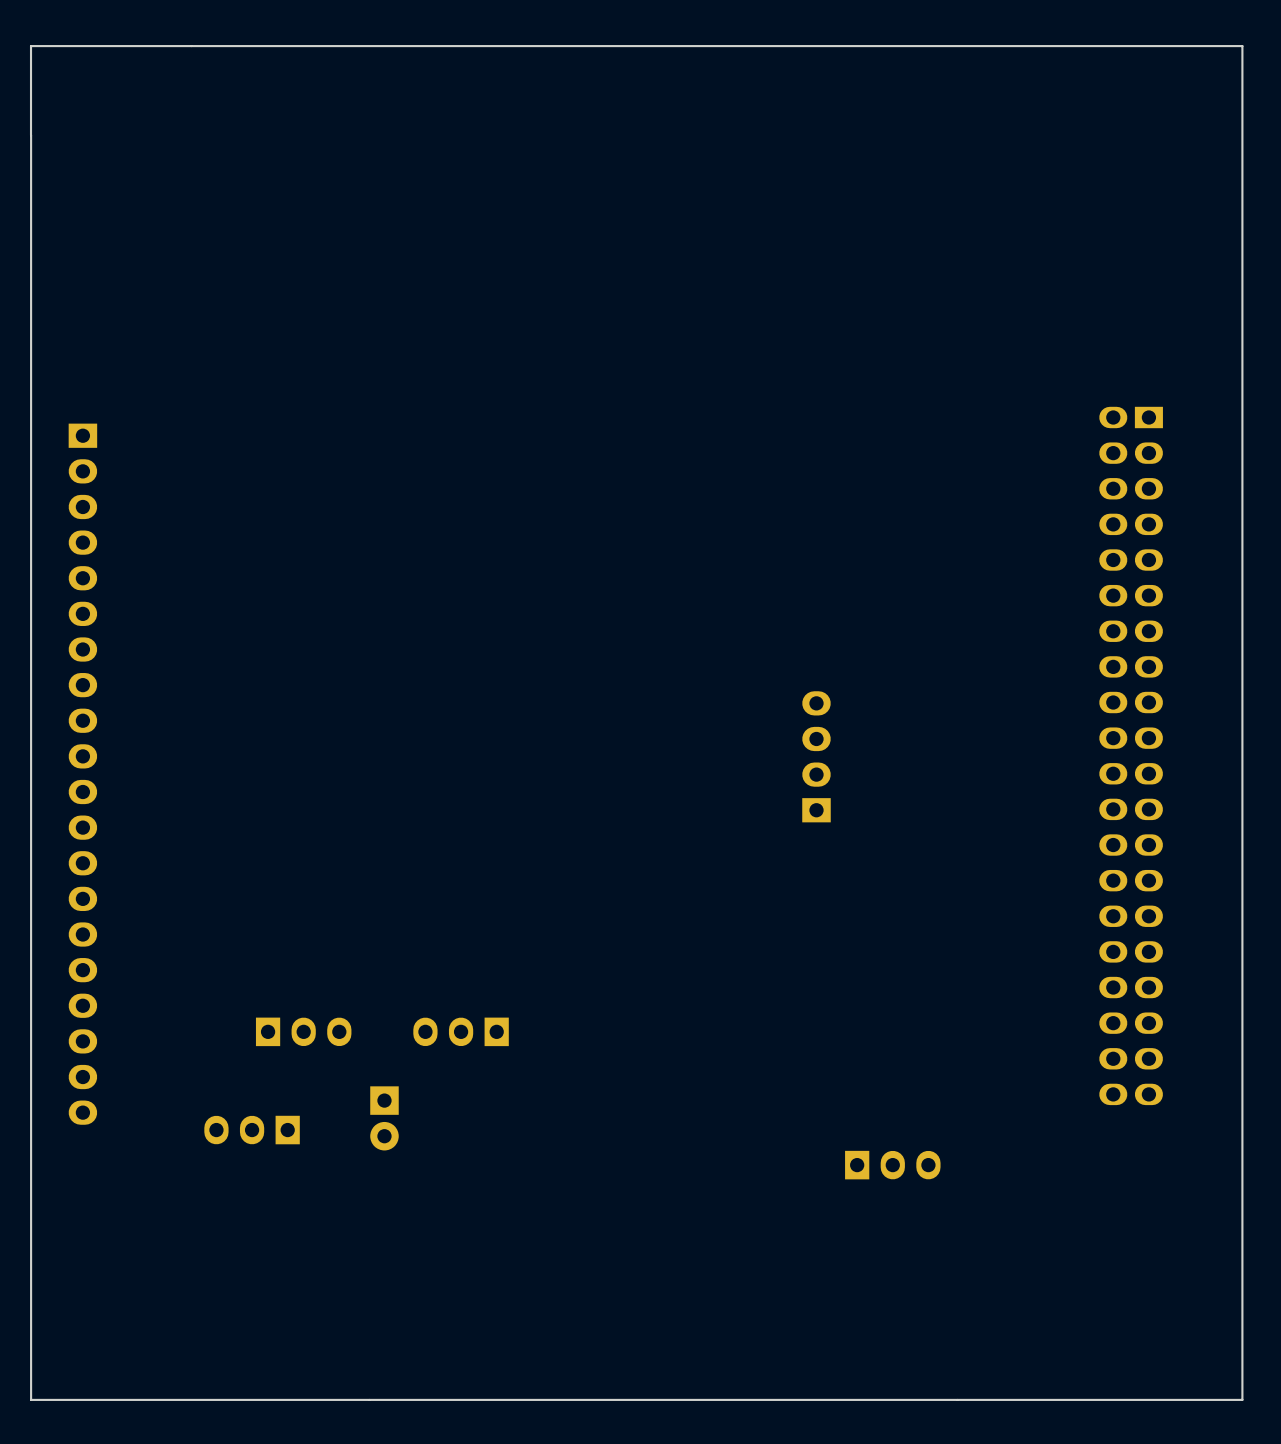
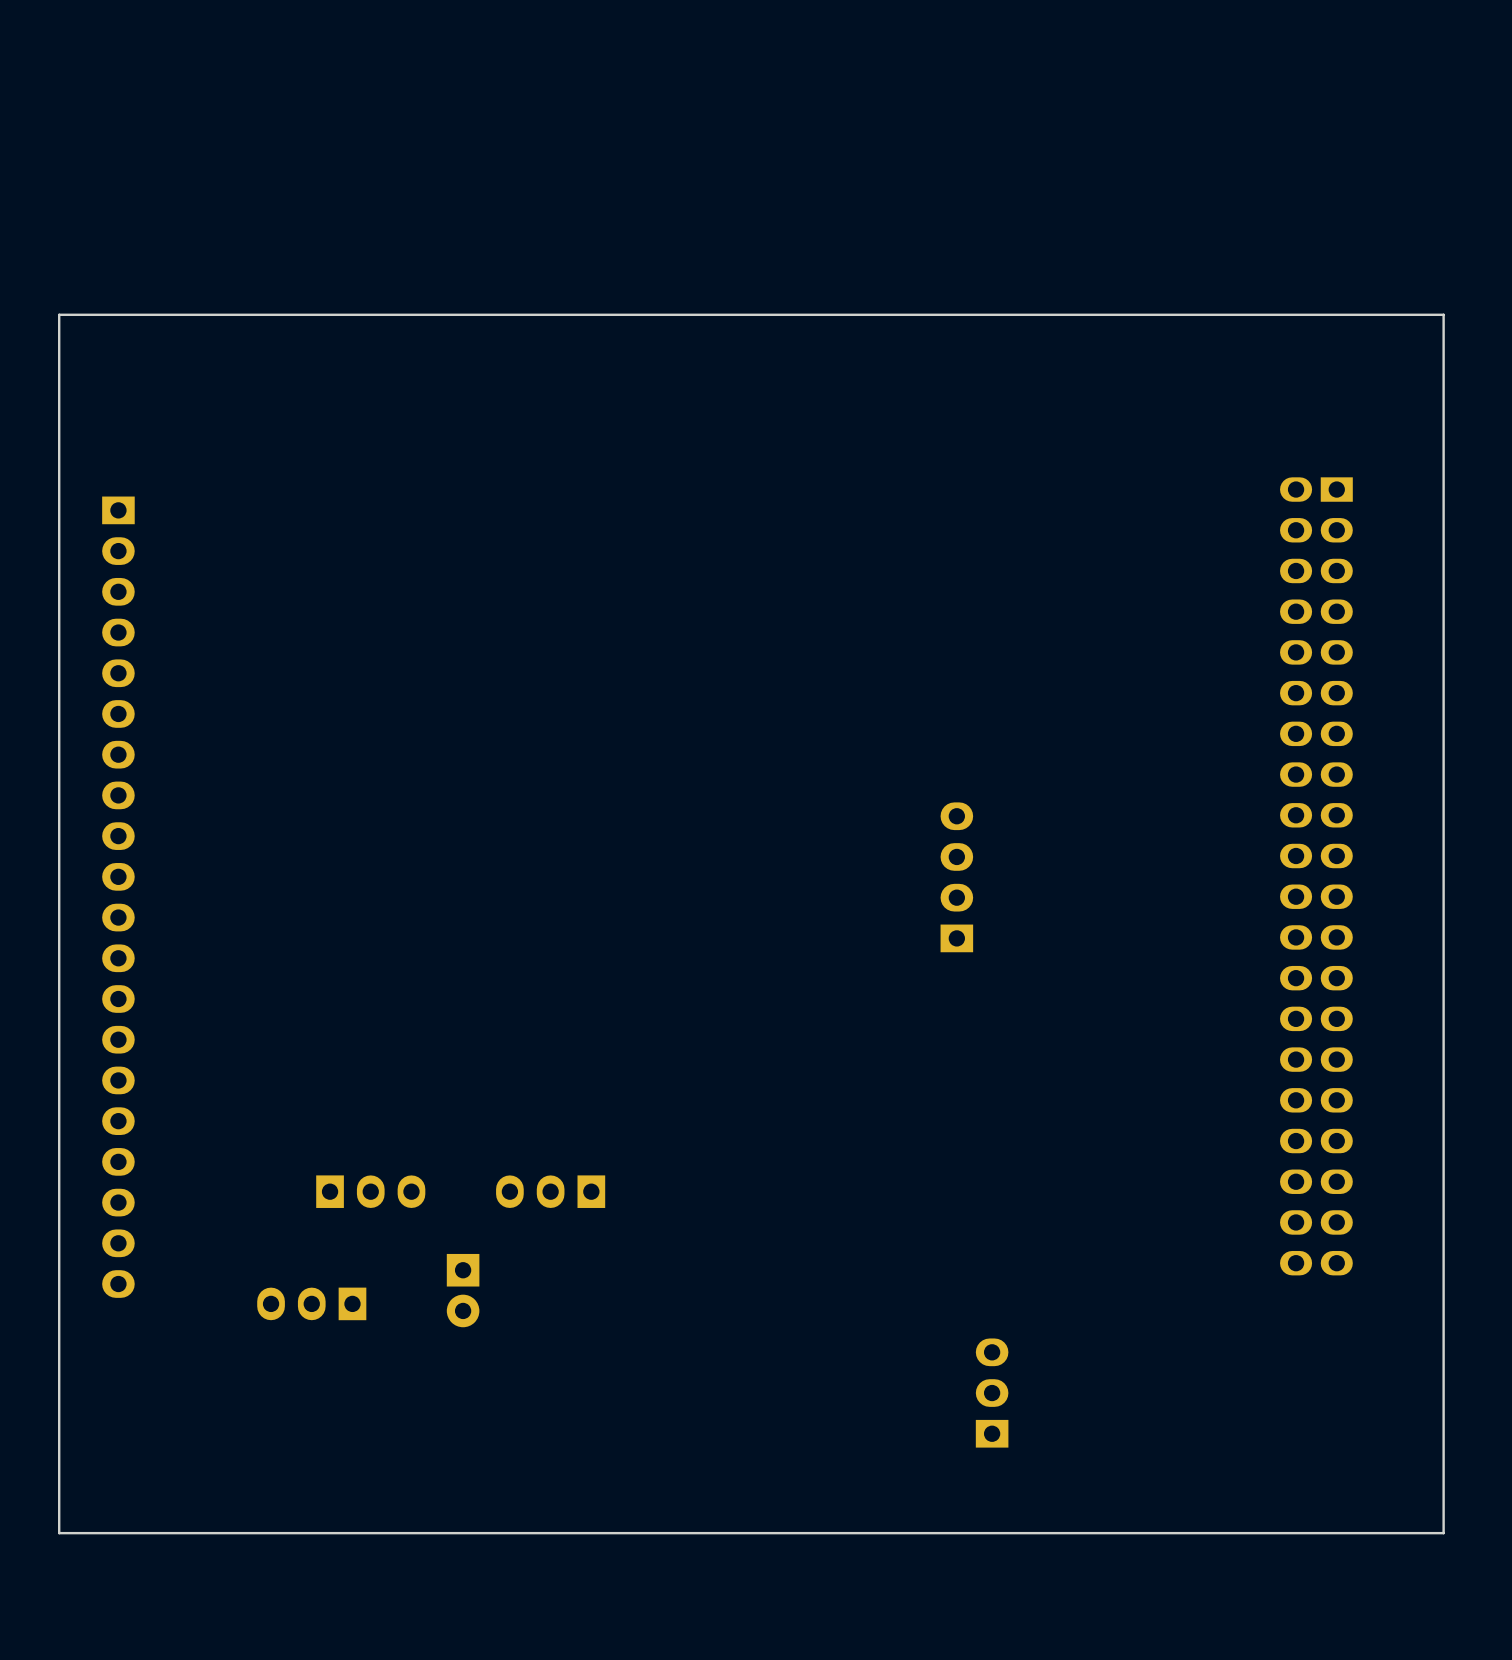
board edge: (1242, 264) (1242, 46) (31, 46) (31, 264) -> (1443, 314) (59, 314)
part rotation: 0° (892, 1165) -> 90° counterclockwise (992, 1393)
part position: (892, 1165) -> (992, 1393)
board edge: (1242, 1330) (1242, 1399) (31, 1399) (31, 1330) -> (1443, 1533) (59, 1533)

